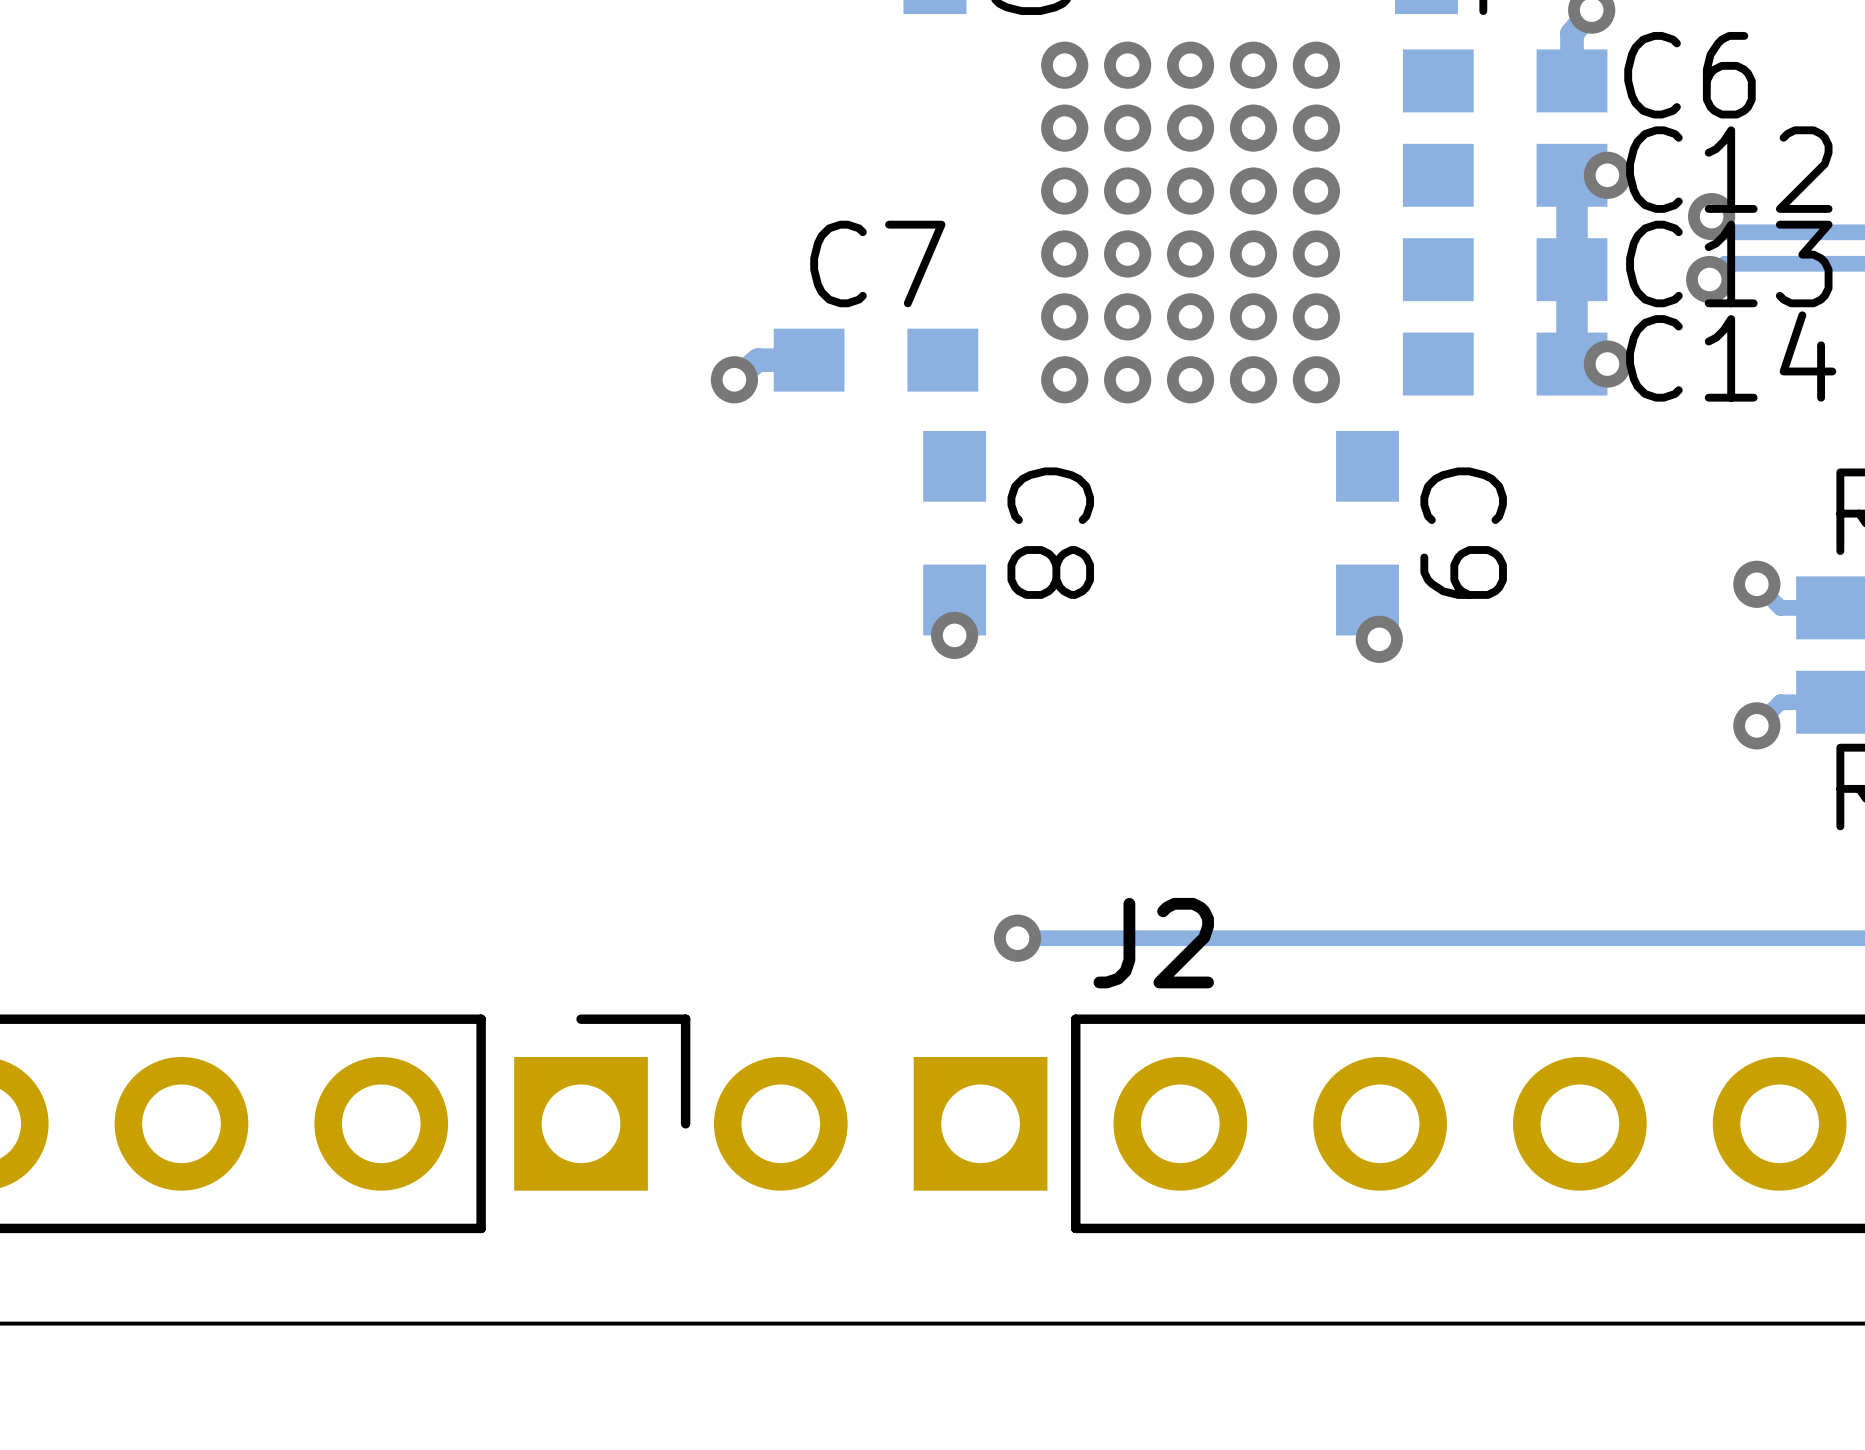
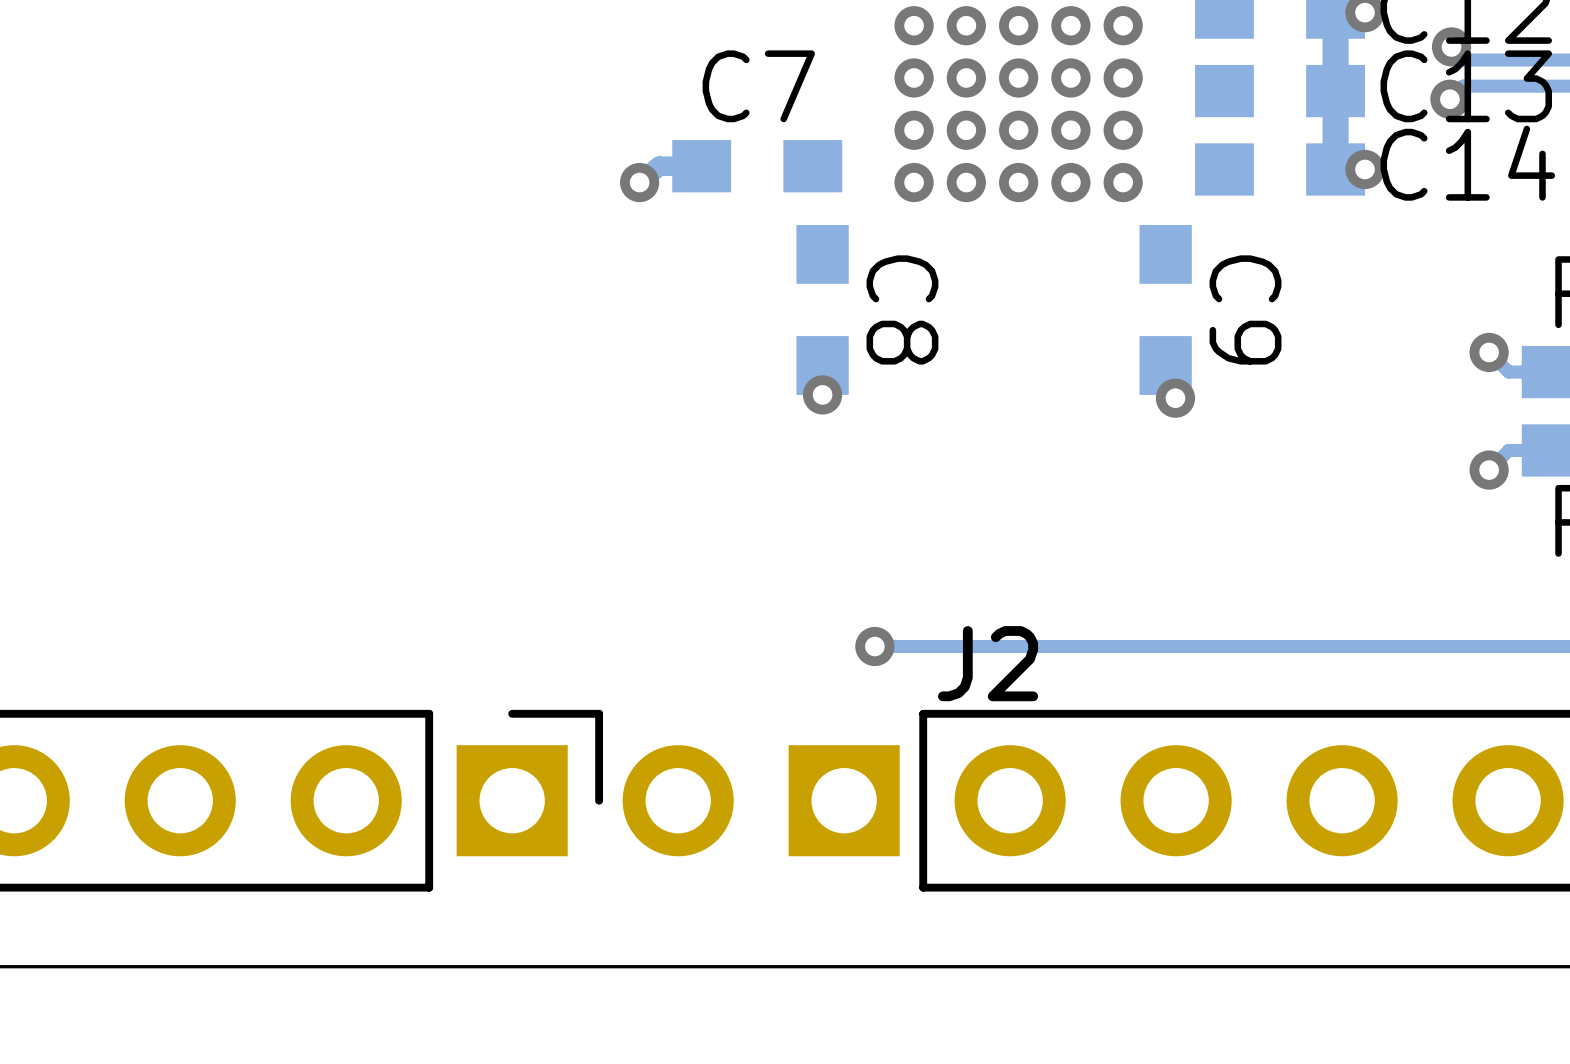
J2 name position: J2 (1153, 943) -> J2 (988, 663)

